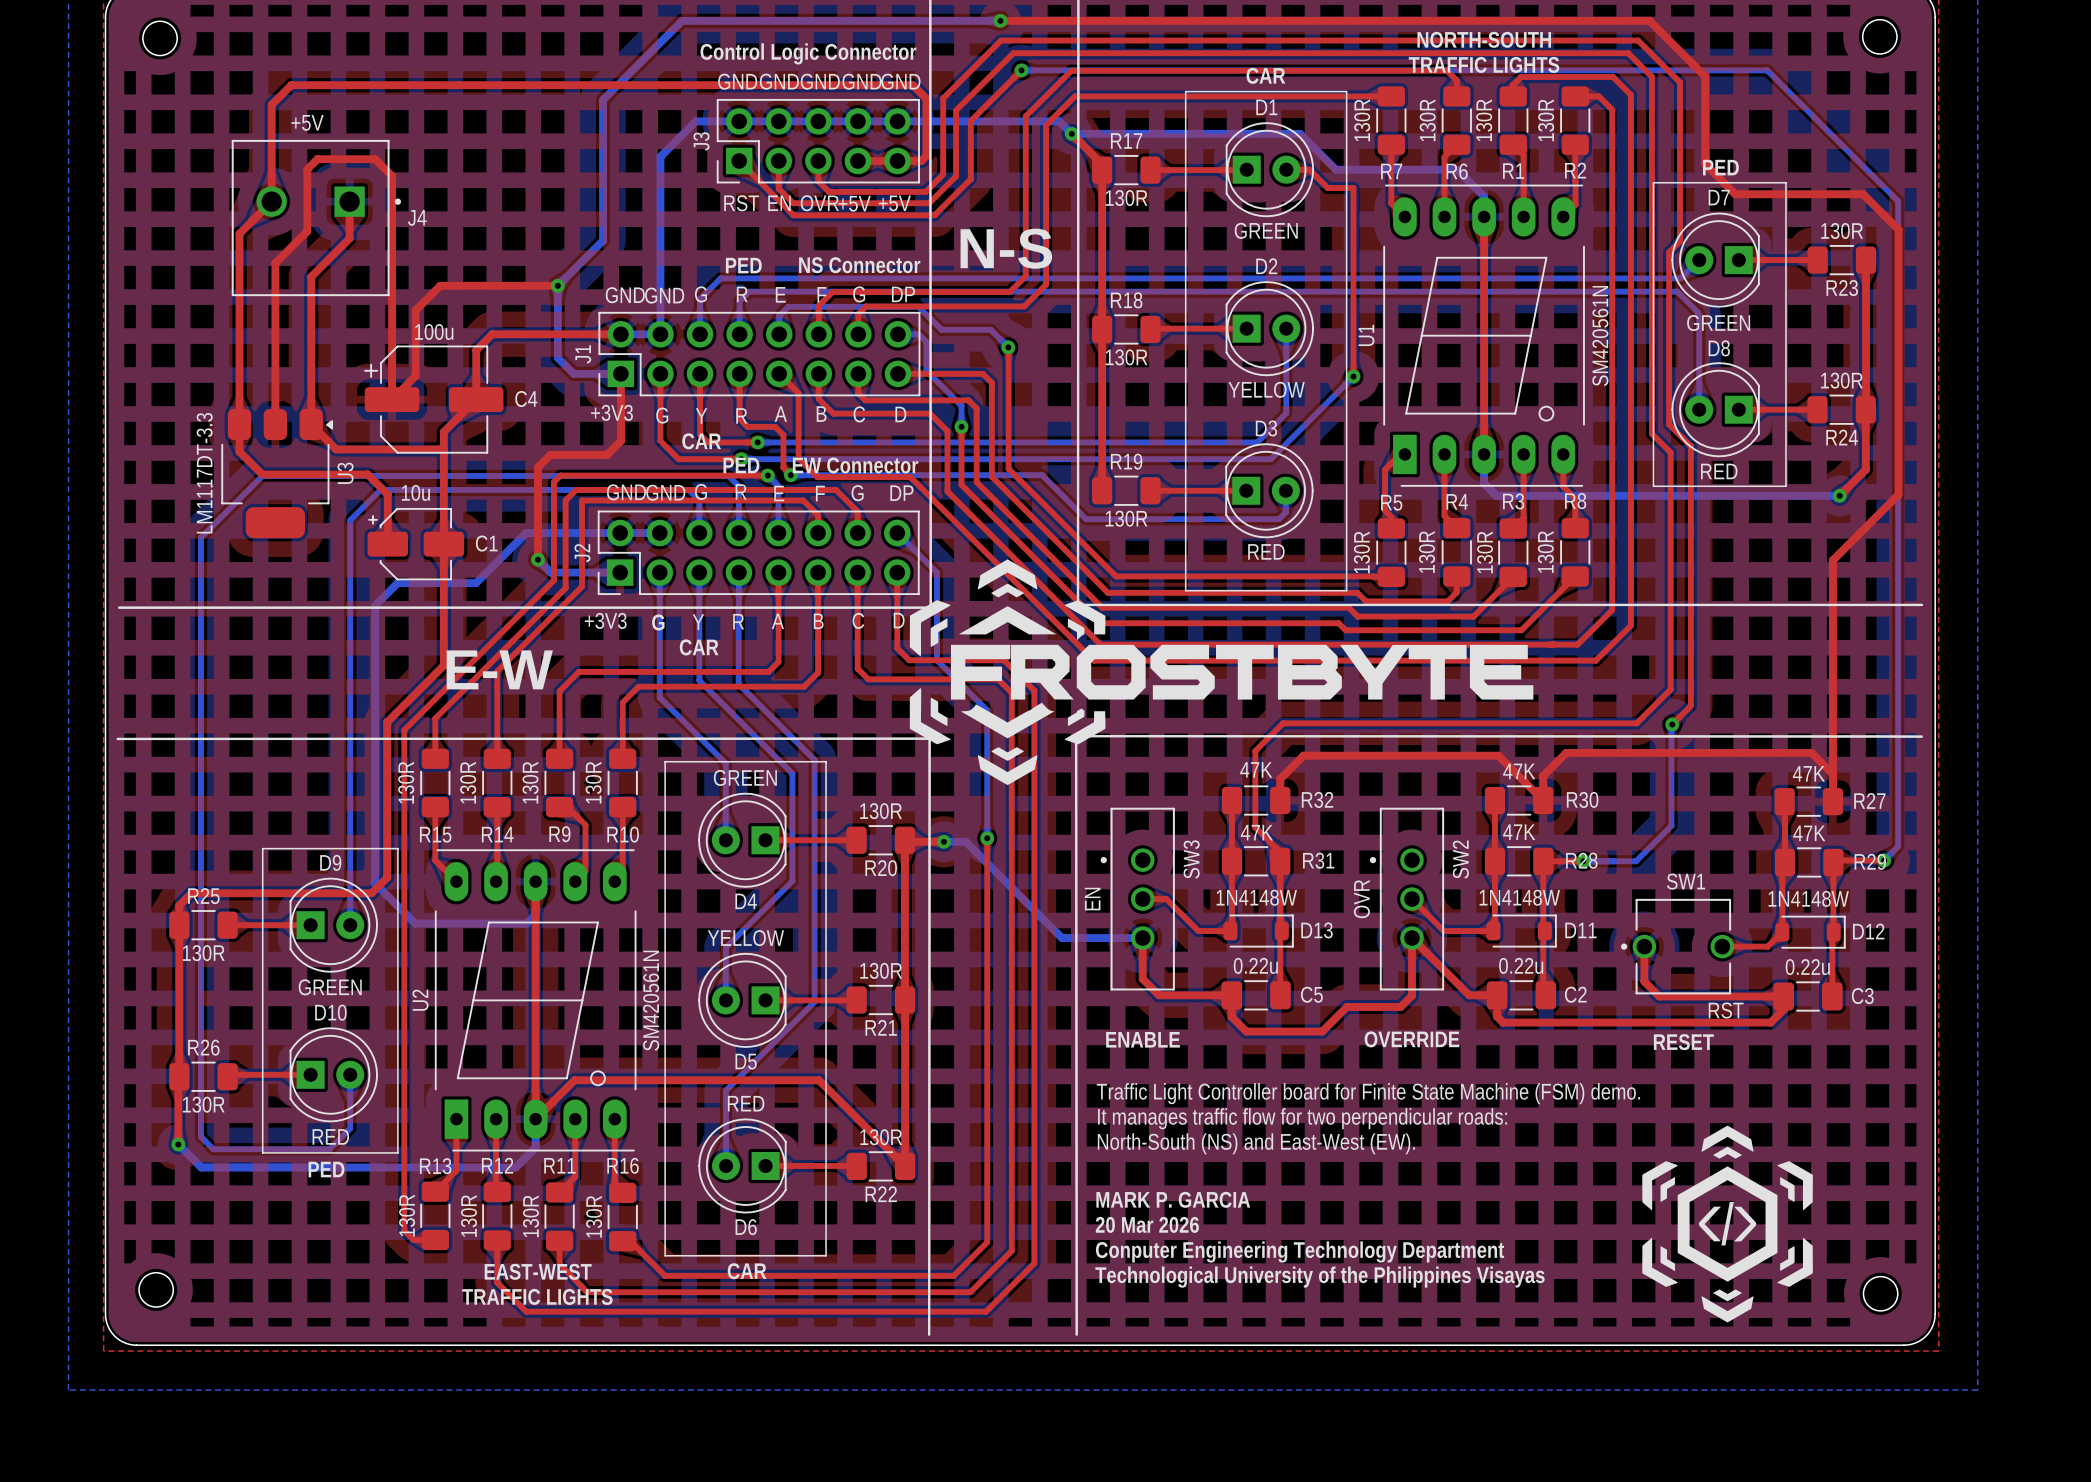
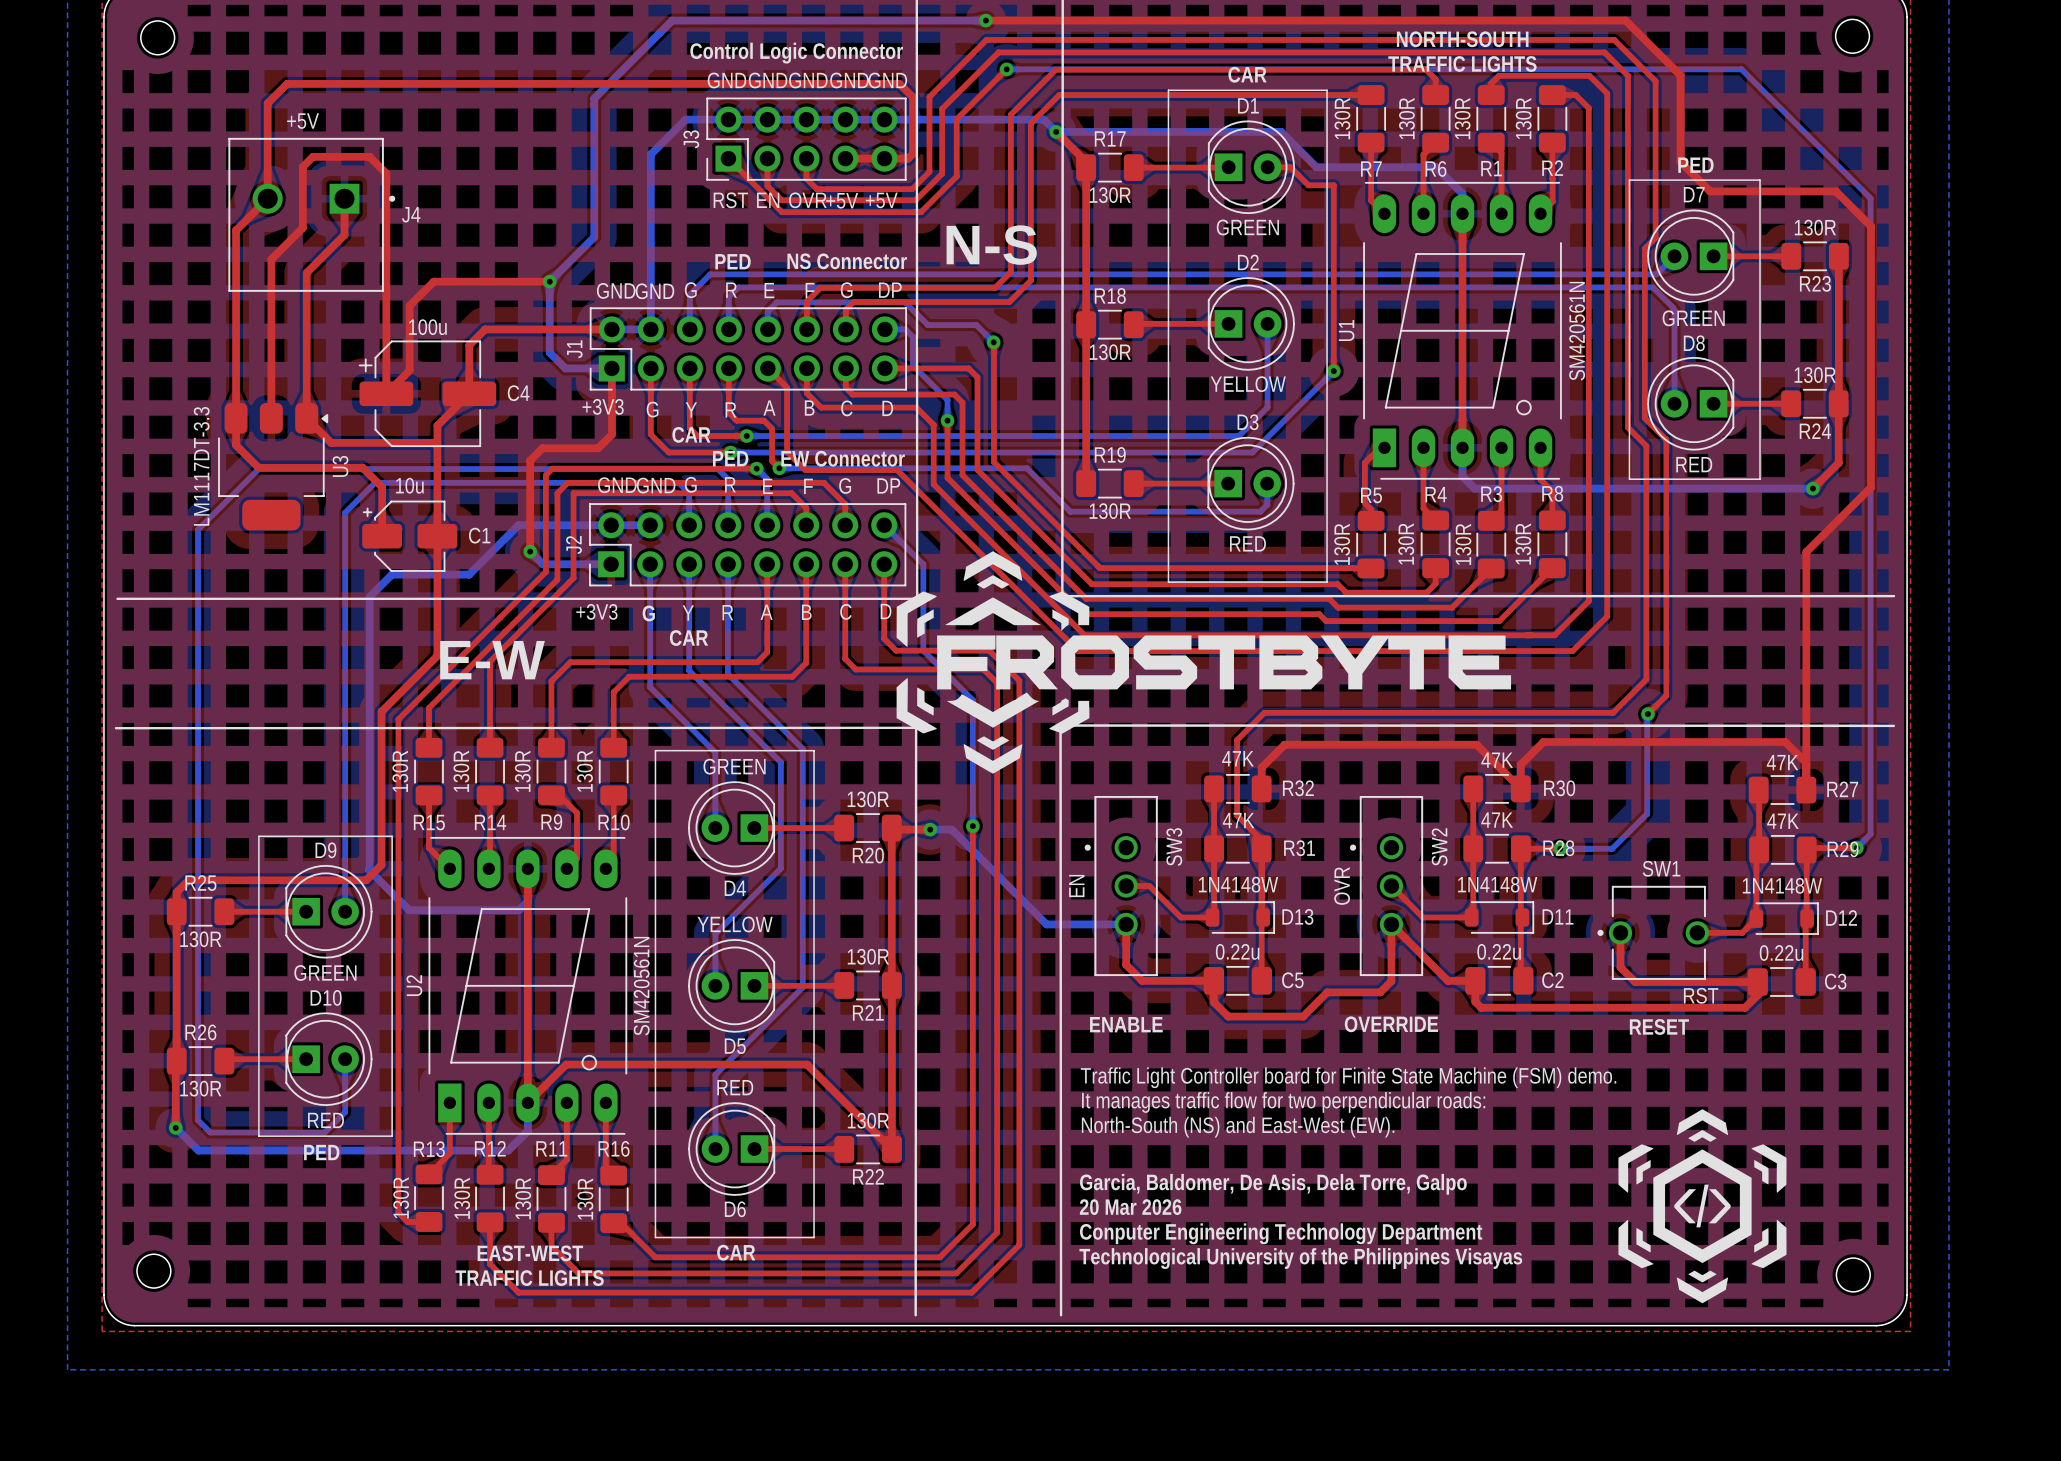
text: MARK P. GARCIA (1173, 1199) -> Garcia, Baldomer, De Asis, Dela Torre, Galpo (1273, 1184)

